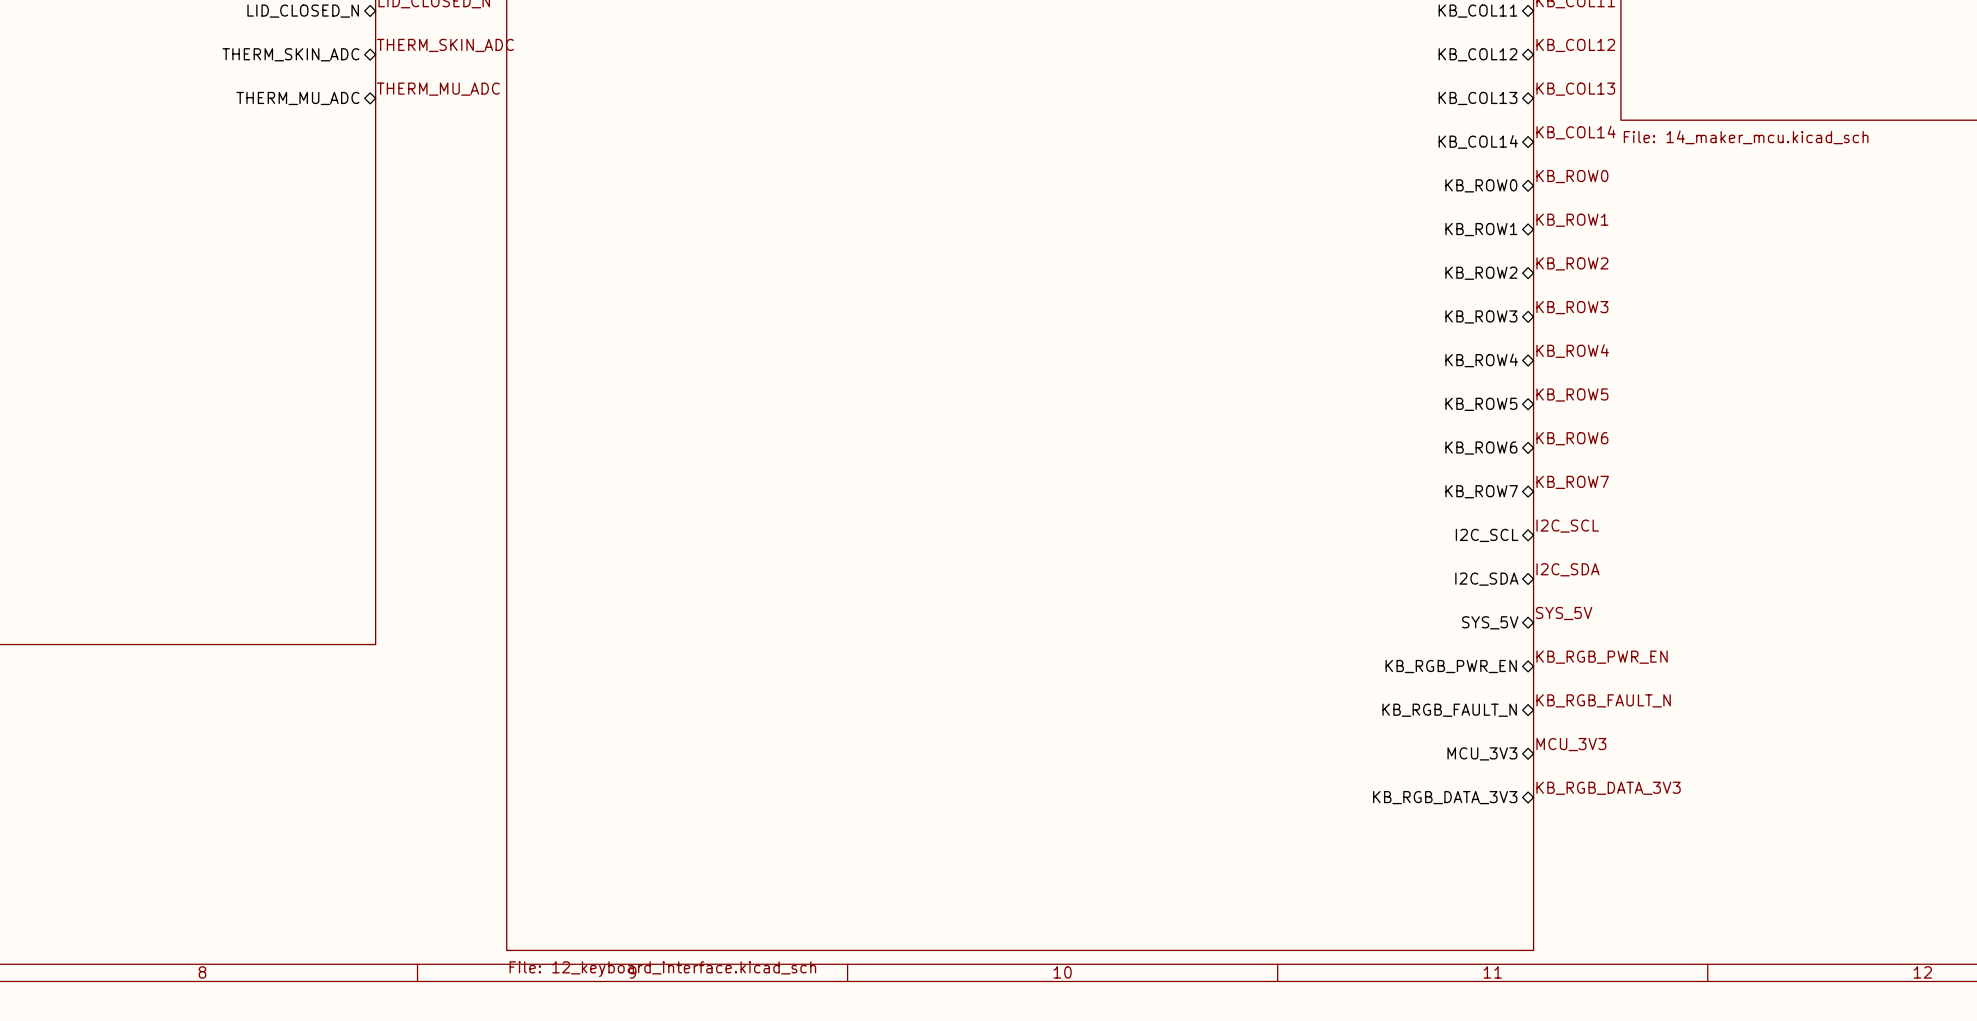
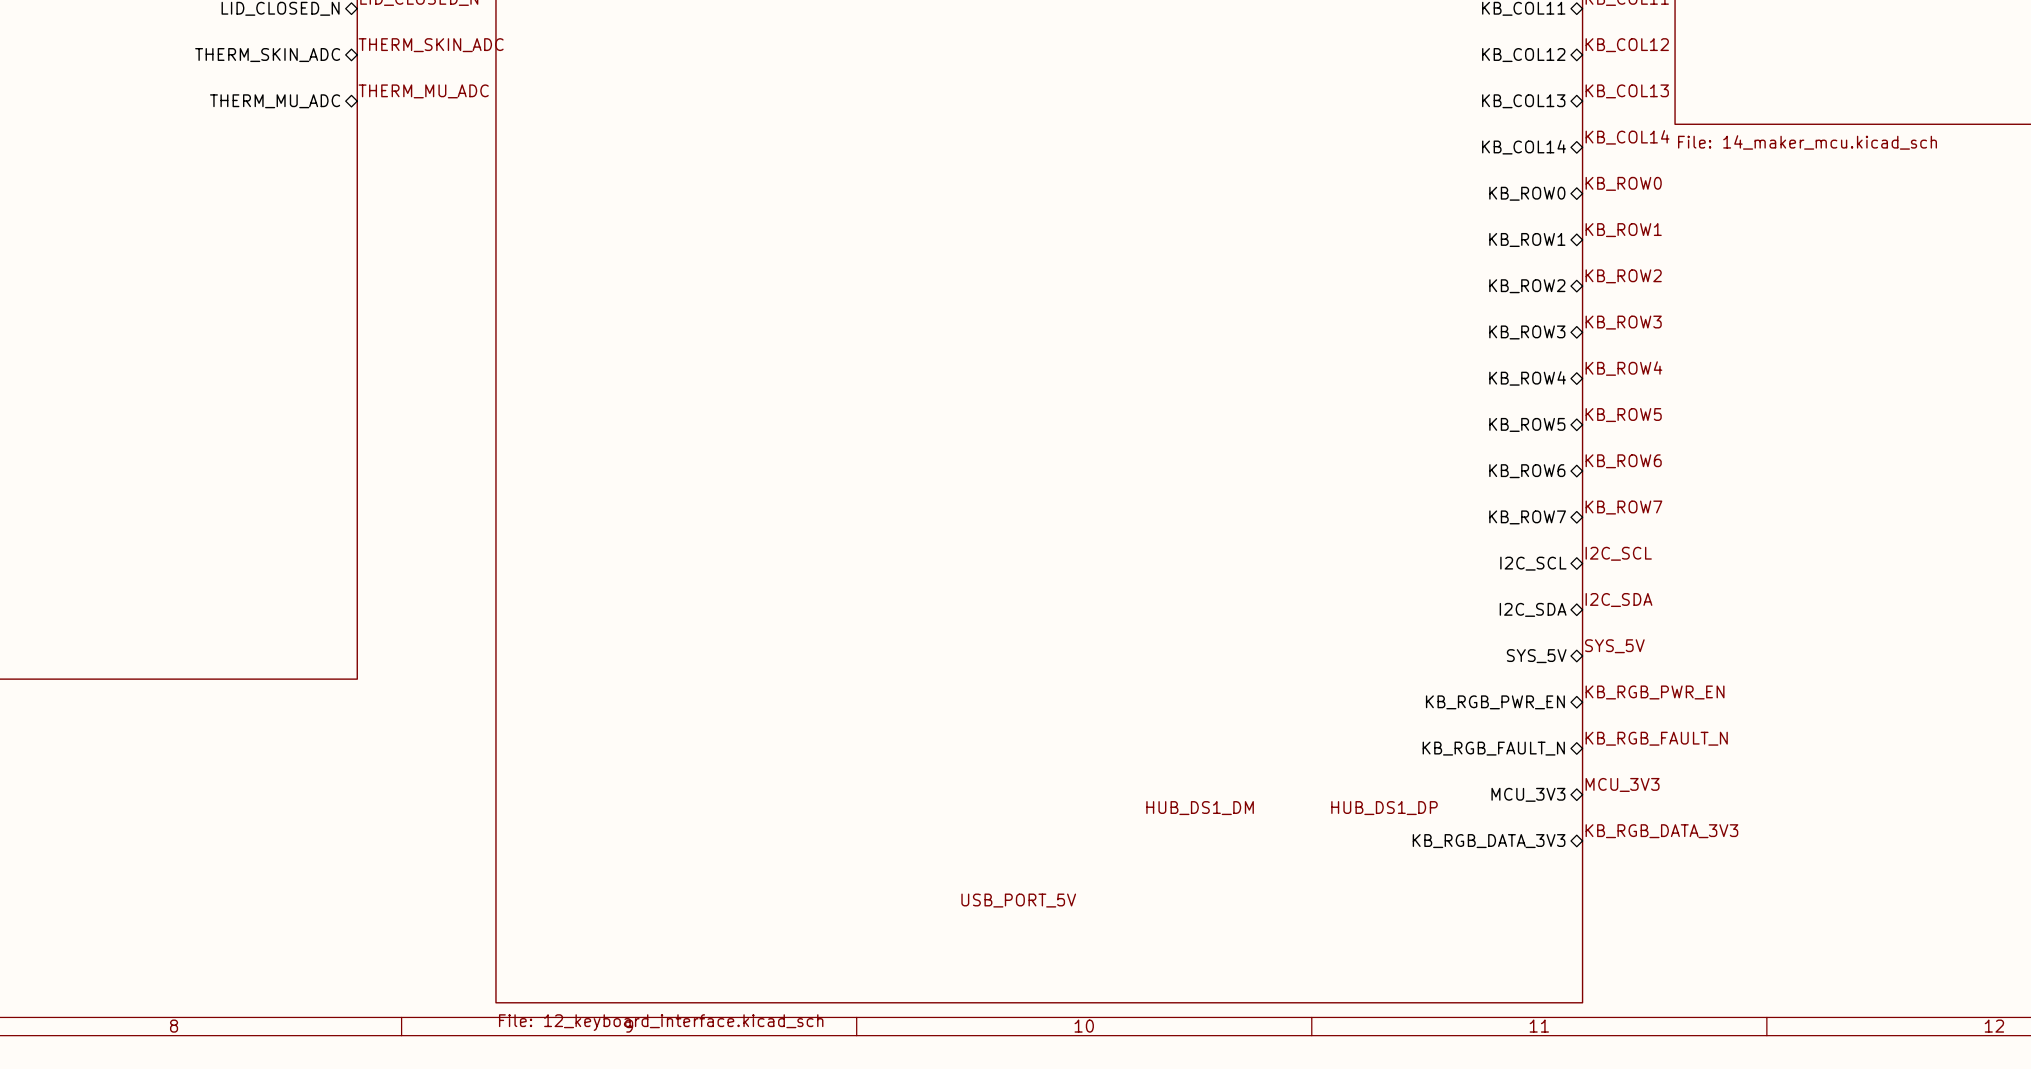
label: none -> HUB_DS1_DM (1200, 808)
label: none -> HUB_DS1_DP (1384, 808)
label: none -> USB_PORT_5V (1018, 900)

